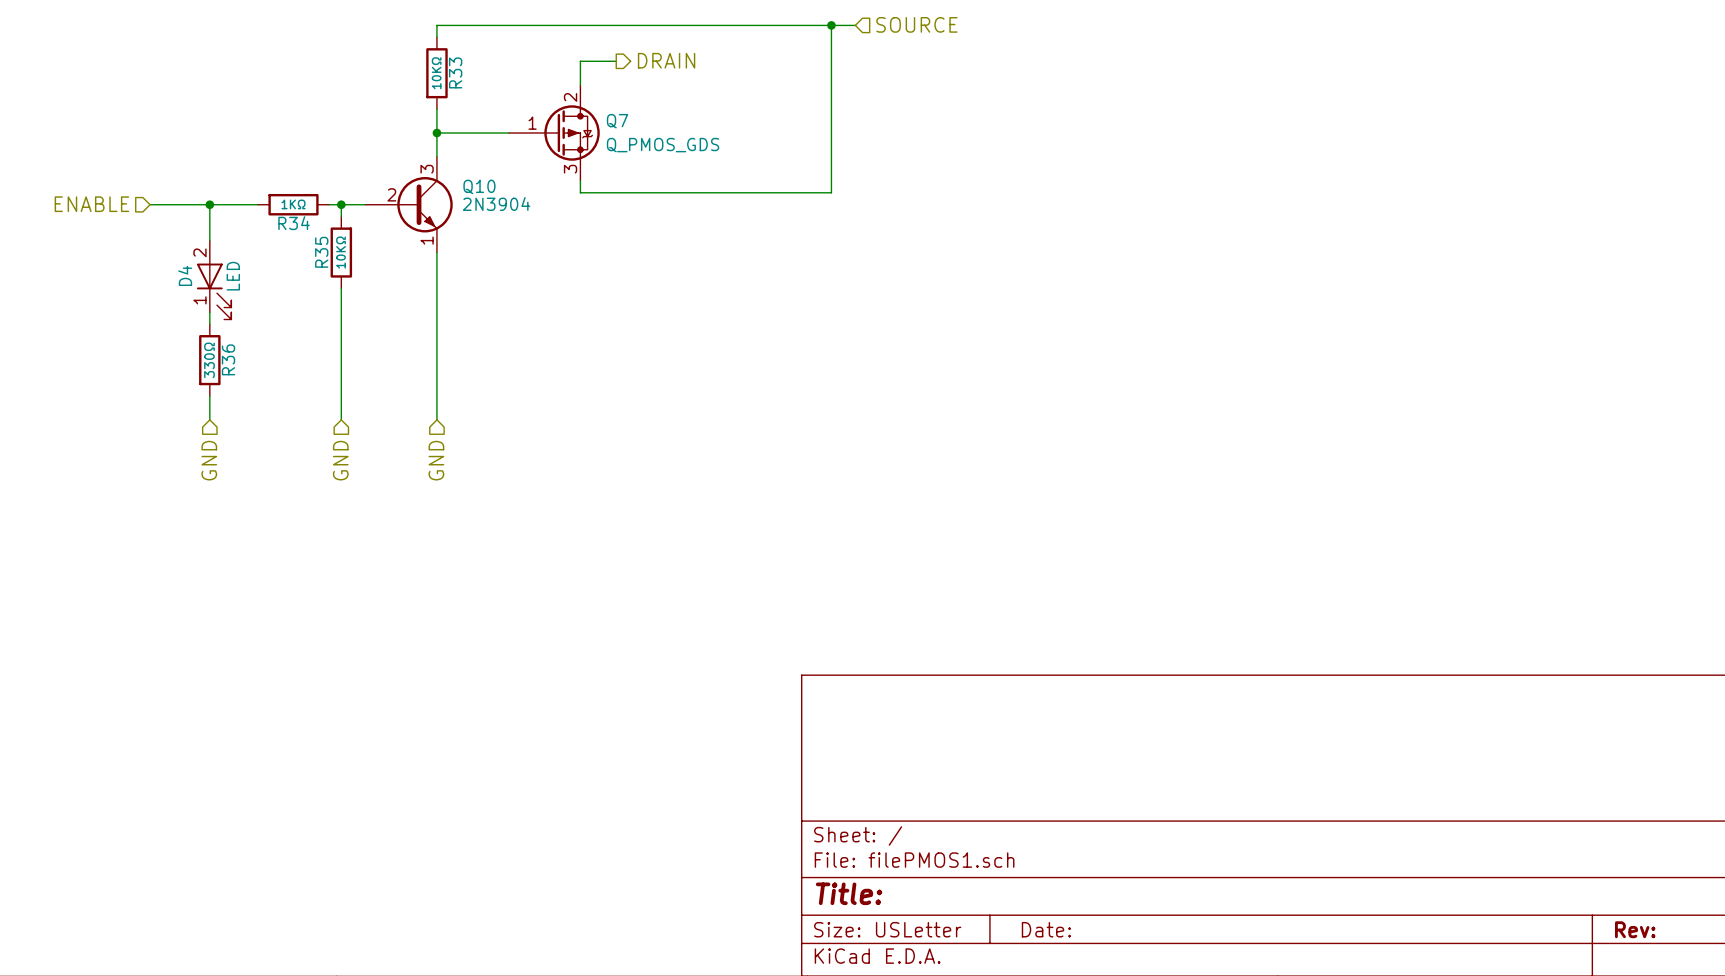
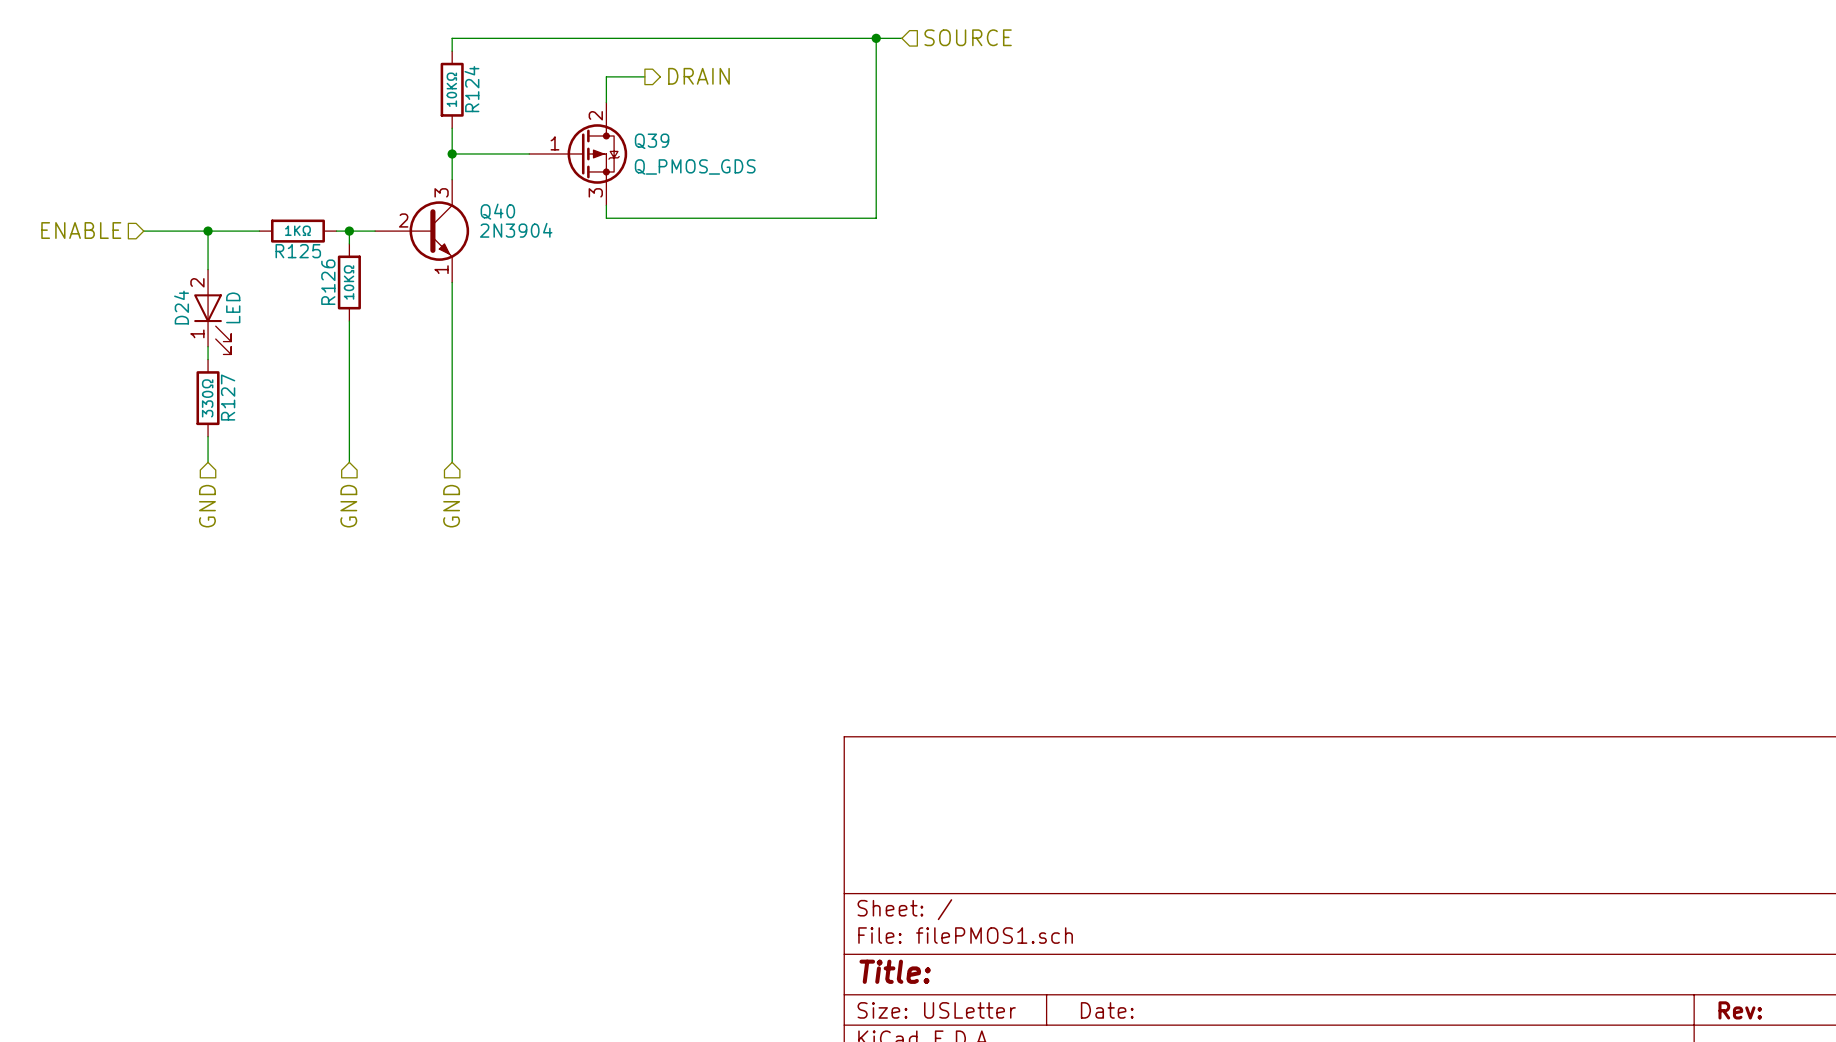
R33 name: R33 (455, 72) -> R124 (471, 89)
Q7 name: Q7 (617, 121) -> Q39 (652, 141)
Q10 name: Q10 (479, 186) -> Q40 (497, 211)
R34 name: R34 (294, 223) -> R125 (298, 251)
R35 name: R35 (321, 252) -> R126 (328, 282)
D4 name: D4 (185, 275) -> D24 (181, 307)
R36 name: R36 (228, 359) -> R127 (228, 397)

